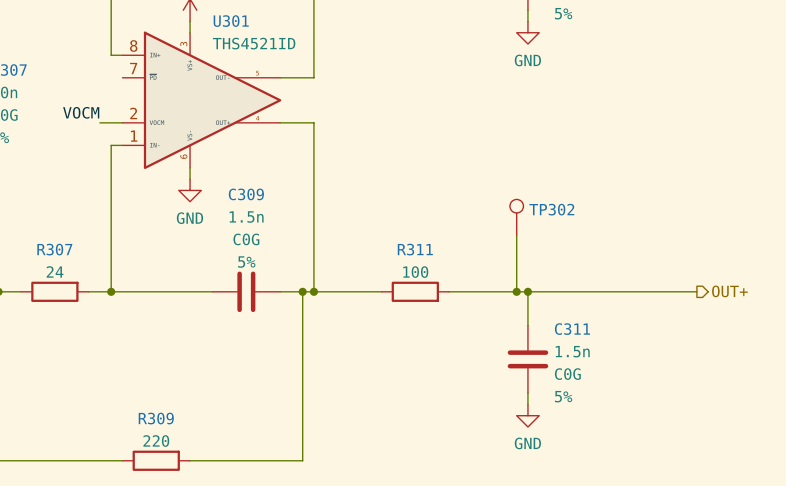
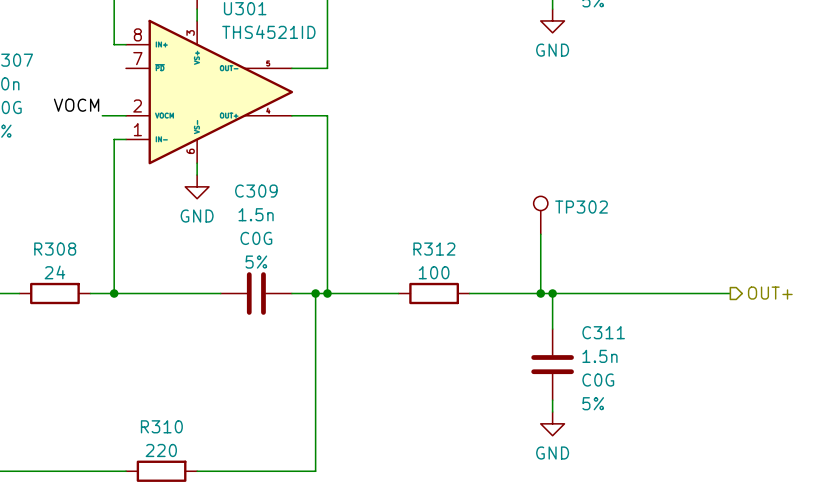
R307 name: R307 (54, 249) -> R308 (55, 249)
R311 name: R311 (415, 249) -> R312 (434, 249)
R309 name: R309 (156, 418) -> R310 (161, 426)

